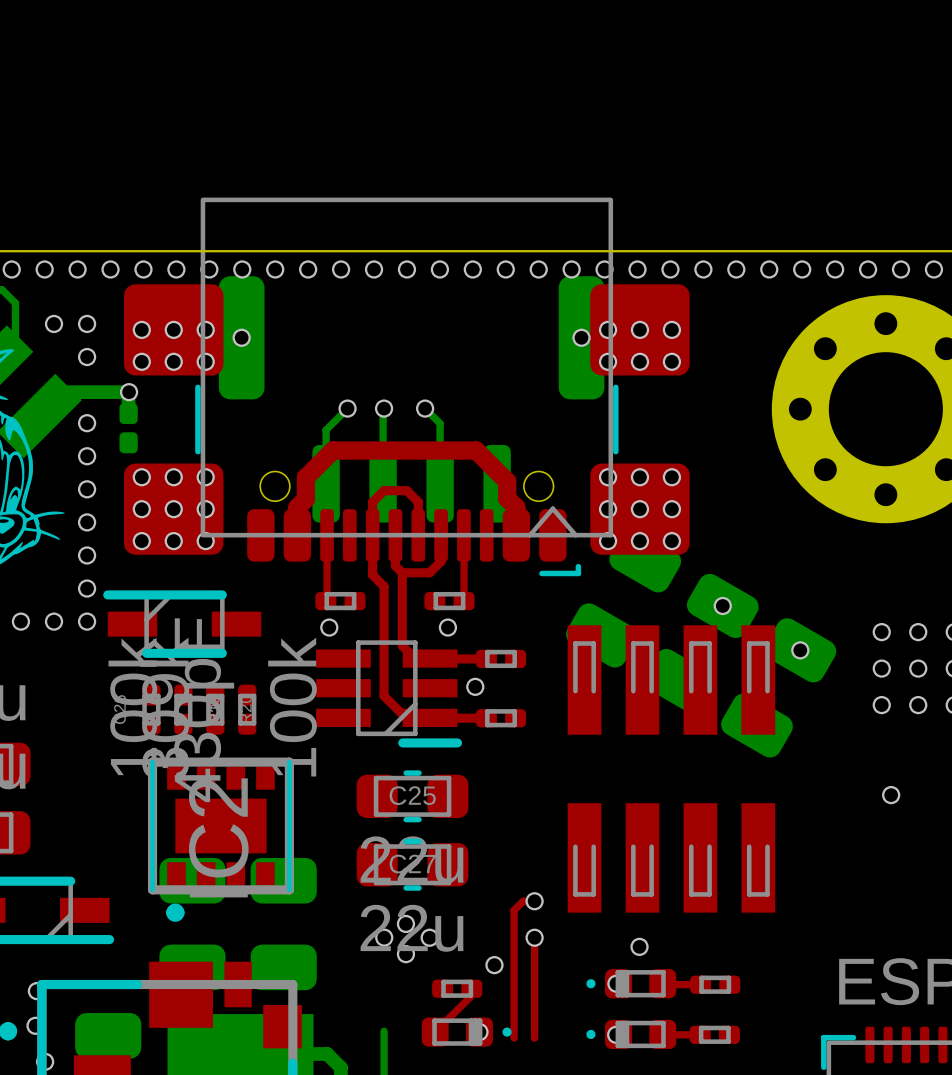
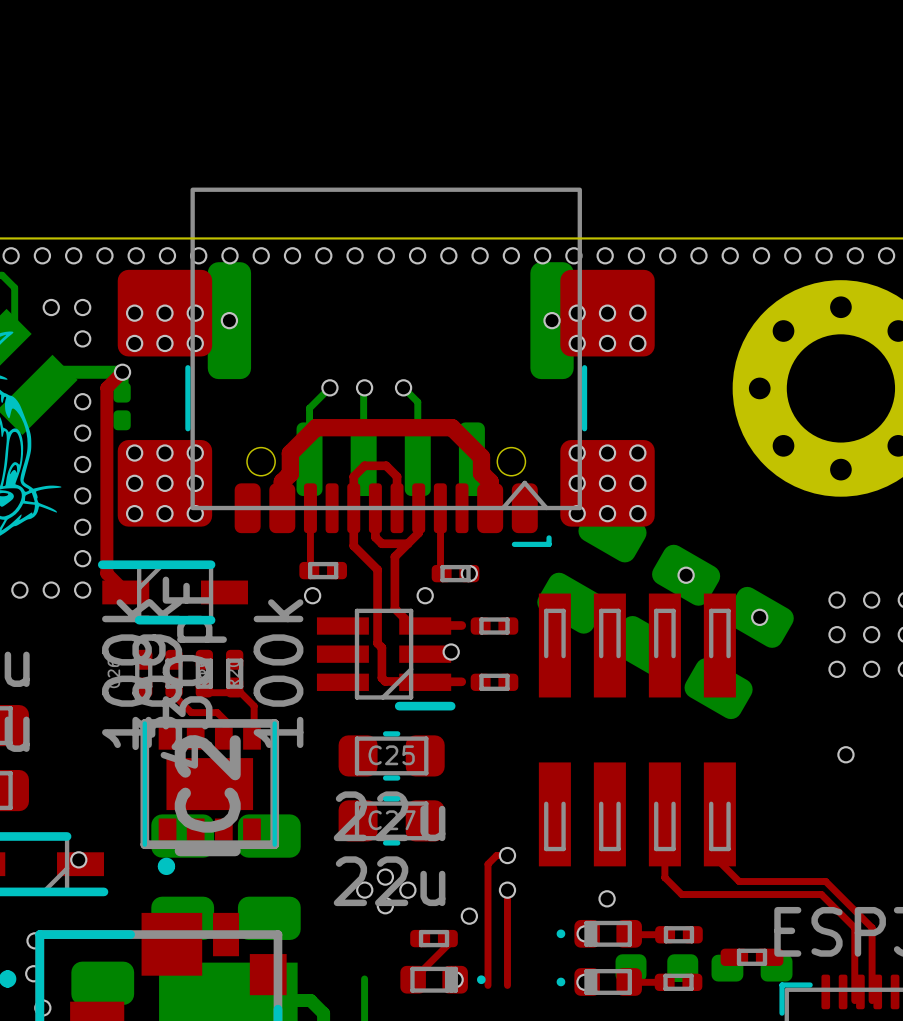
top track: none -> (122, 372) (106, 387) (106, 573) (125, 592)
top track: (402, 572) (402, 645) (415, 658) (430, 658) -> none
top track: none -> (407, 543) (394, 556) (394, 608) (412, 626) (425, 626)
top track: (384, 586) (384, 695) (402, 714) -> (364, 556) (377, 569) (377, 643) (381, 647) (381, 677)
part position: (449, 601) -> (455, 573)
via: none -> (469, 573)
part position: (501, 658) -> (494, 626)
part position: (389, 693) -> (386, 659)
part position: (501, 718) -> (494, 682)
top track: none -> (174, 692) (174, 695) (191, 712) (217, 712) (226, 721) (226, 738)
top track: none -> (204, 692) (240, 692) (254, 706) (254, 738)
top track: none -> (664, 814) (664, 877) (681, 894) (821, 894) (854, 927) (854, 1000)
top track: none -> (719, 814) (719, 862) (739, 881) (825, 881) (872, 927) (872, 1000)
via: none -> (78, 859)
part: none -> (752, 957)
part: none -> (656, 968)
part: none -> (752, 968)

